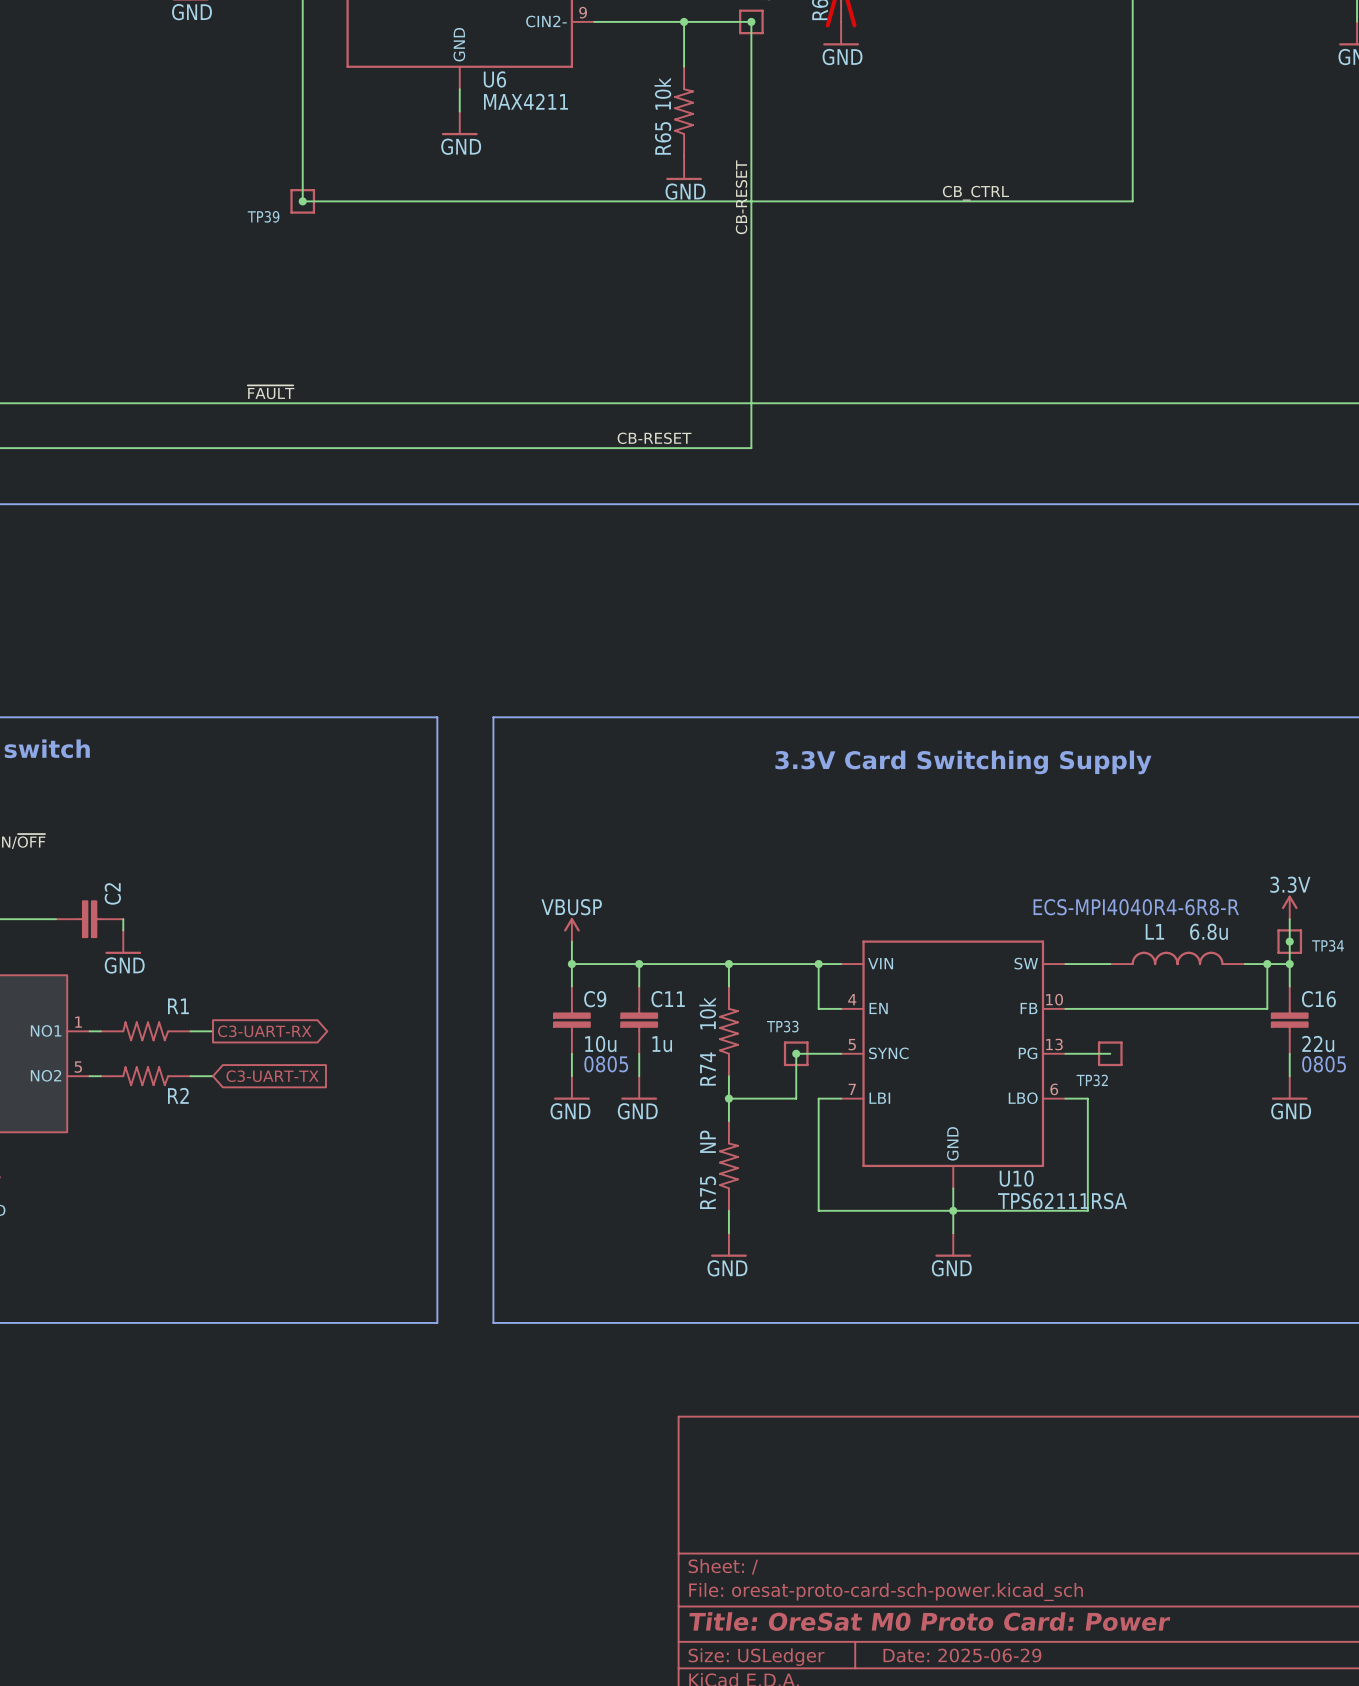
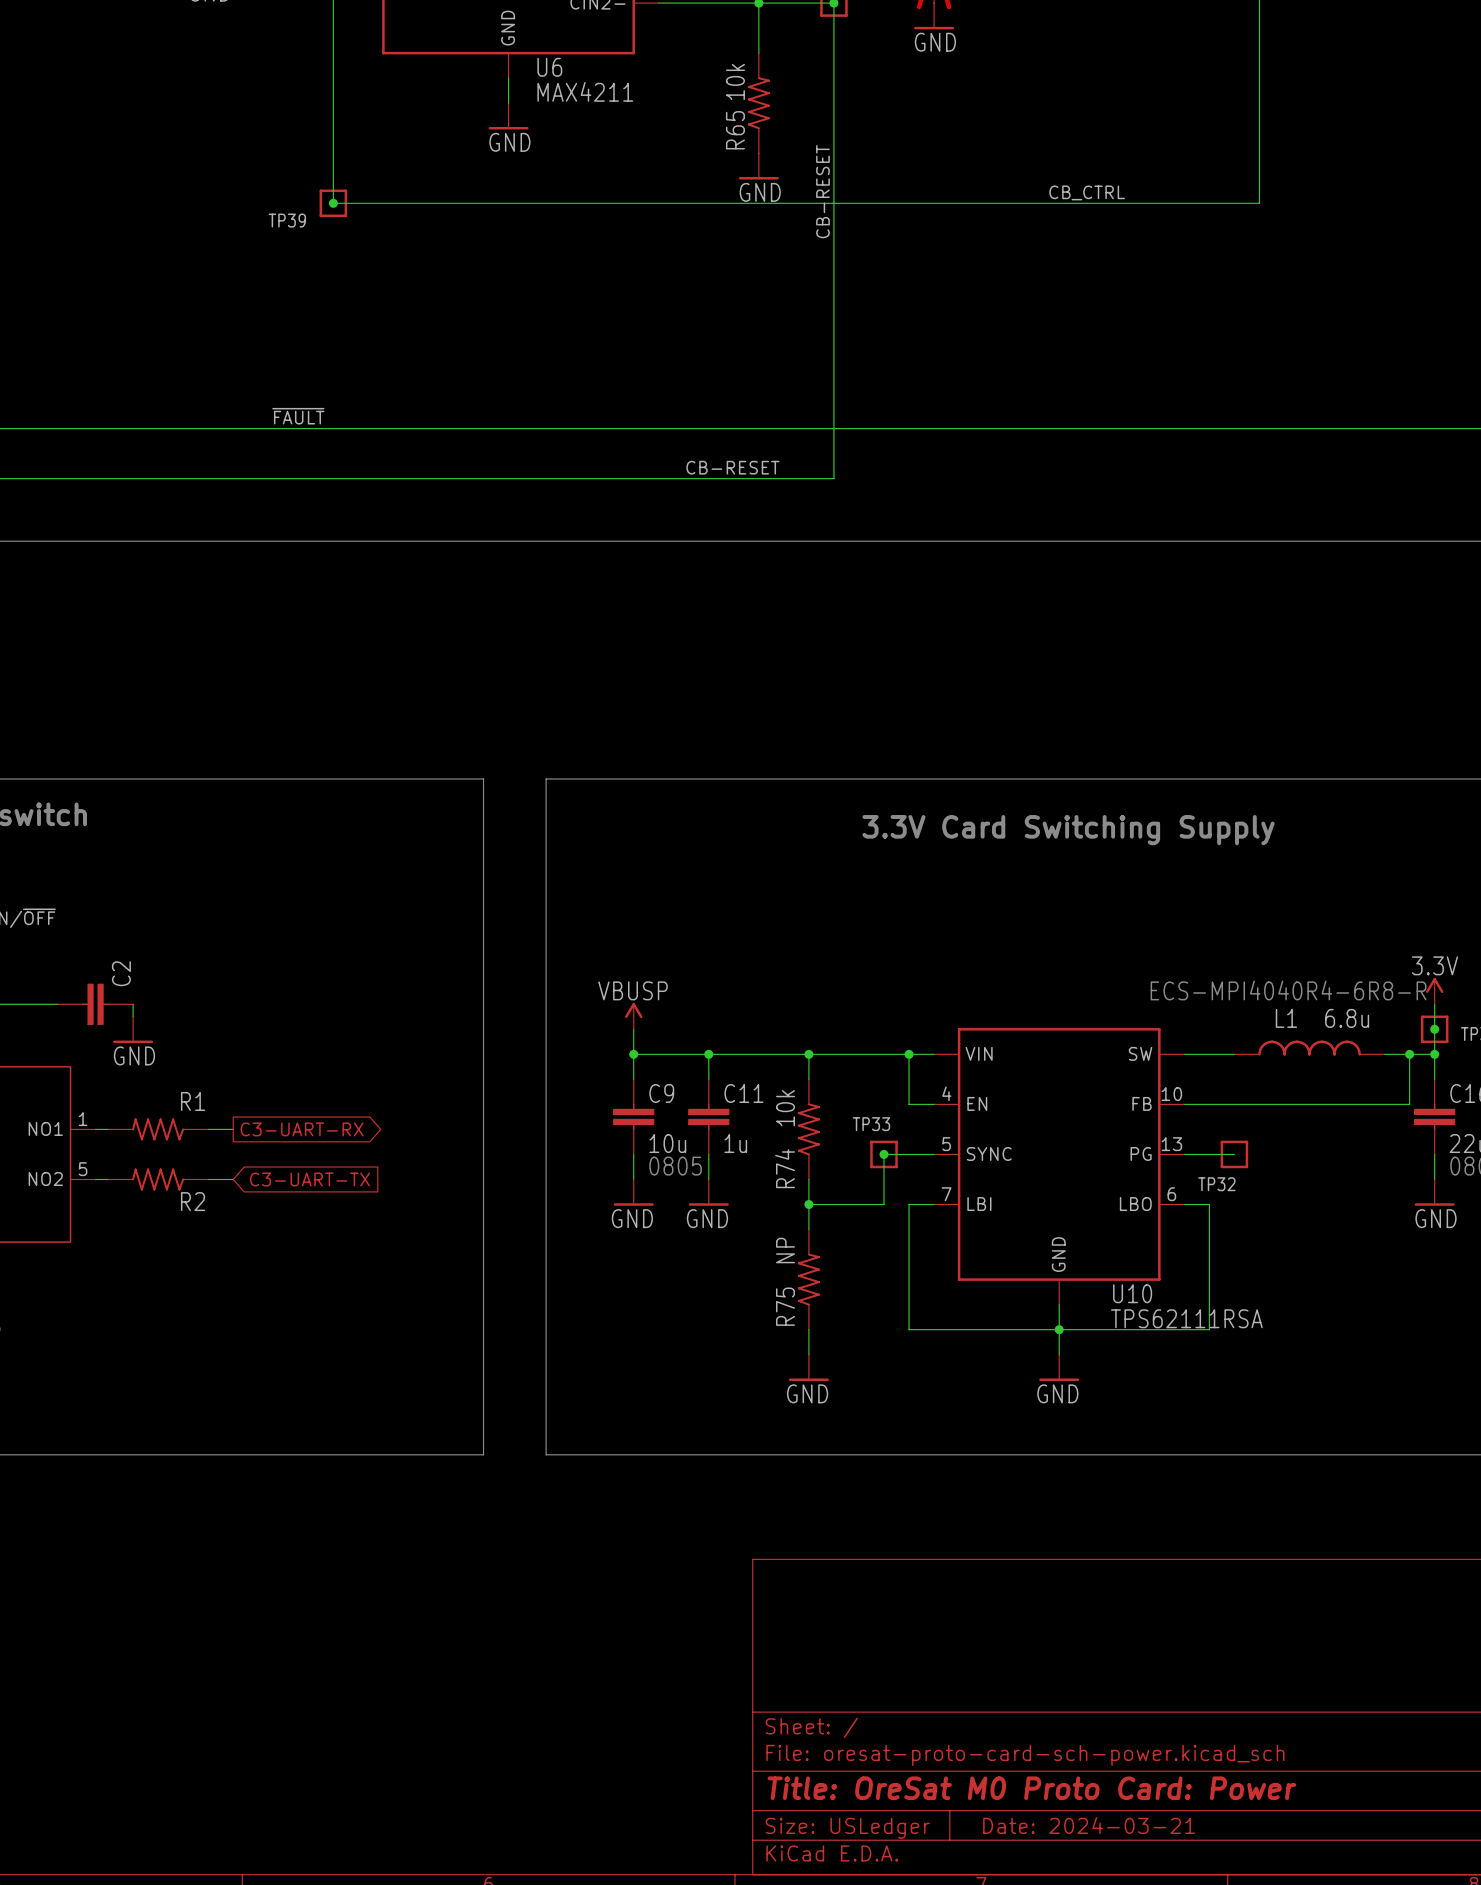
title block: Date: 2025-06-29 (962, 1655) -> Date: 2024-03-21 (1089, 1825)

